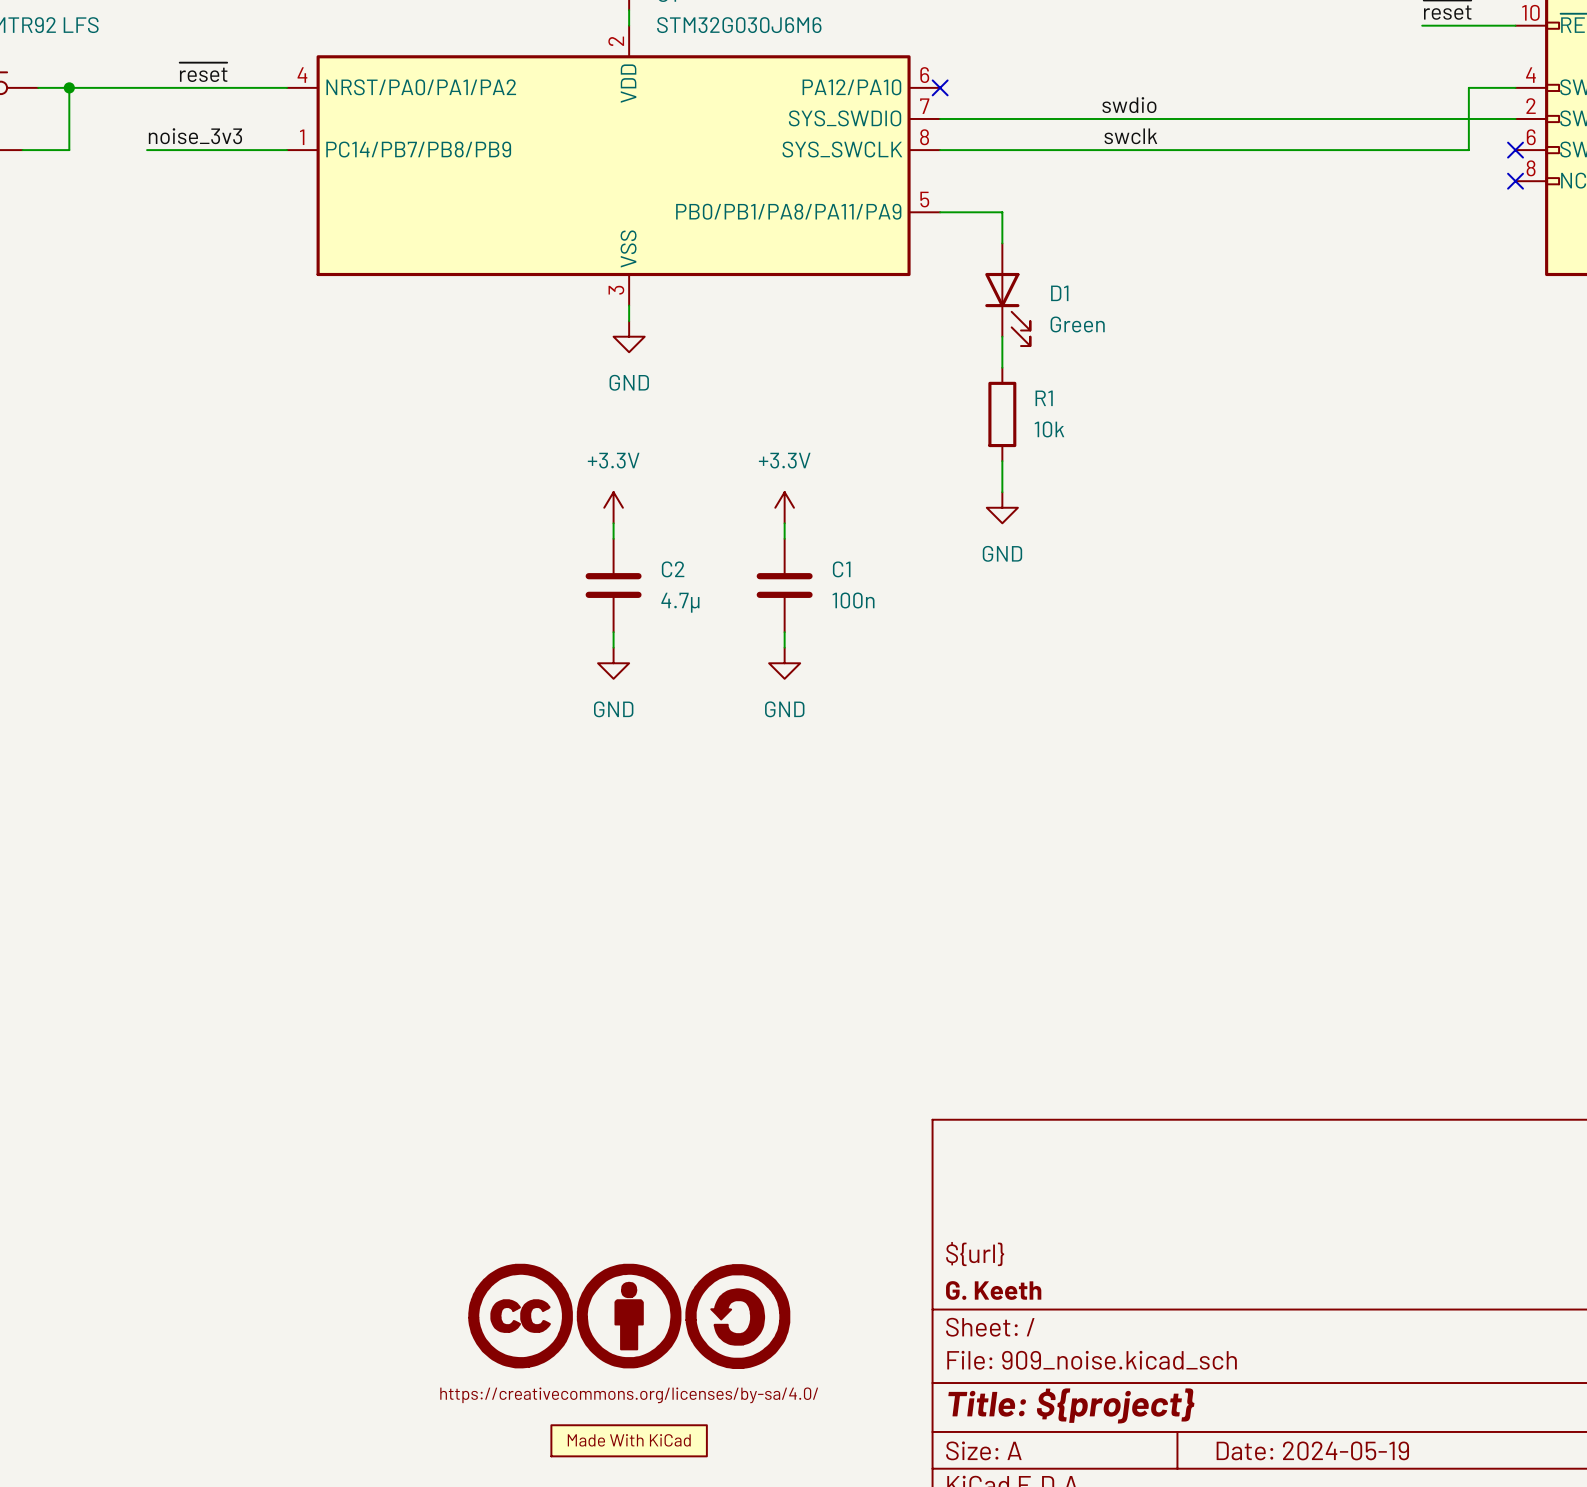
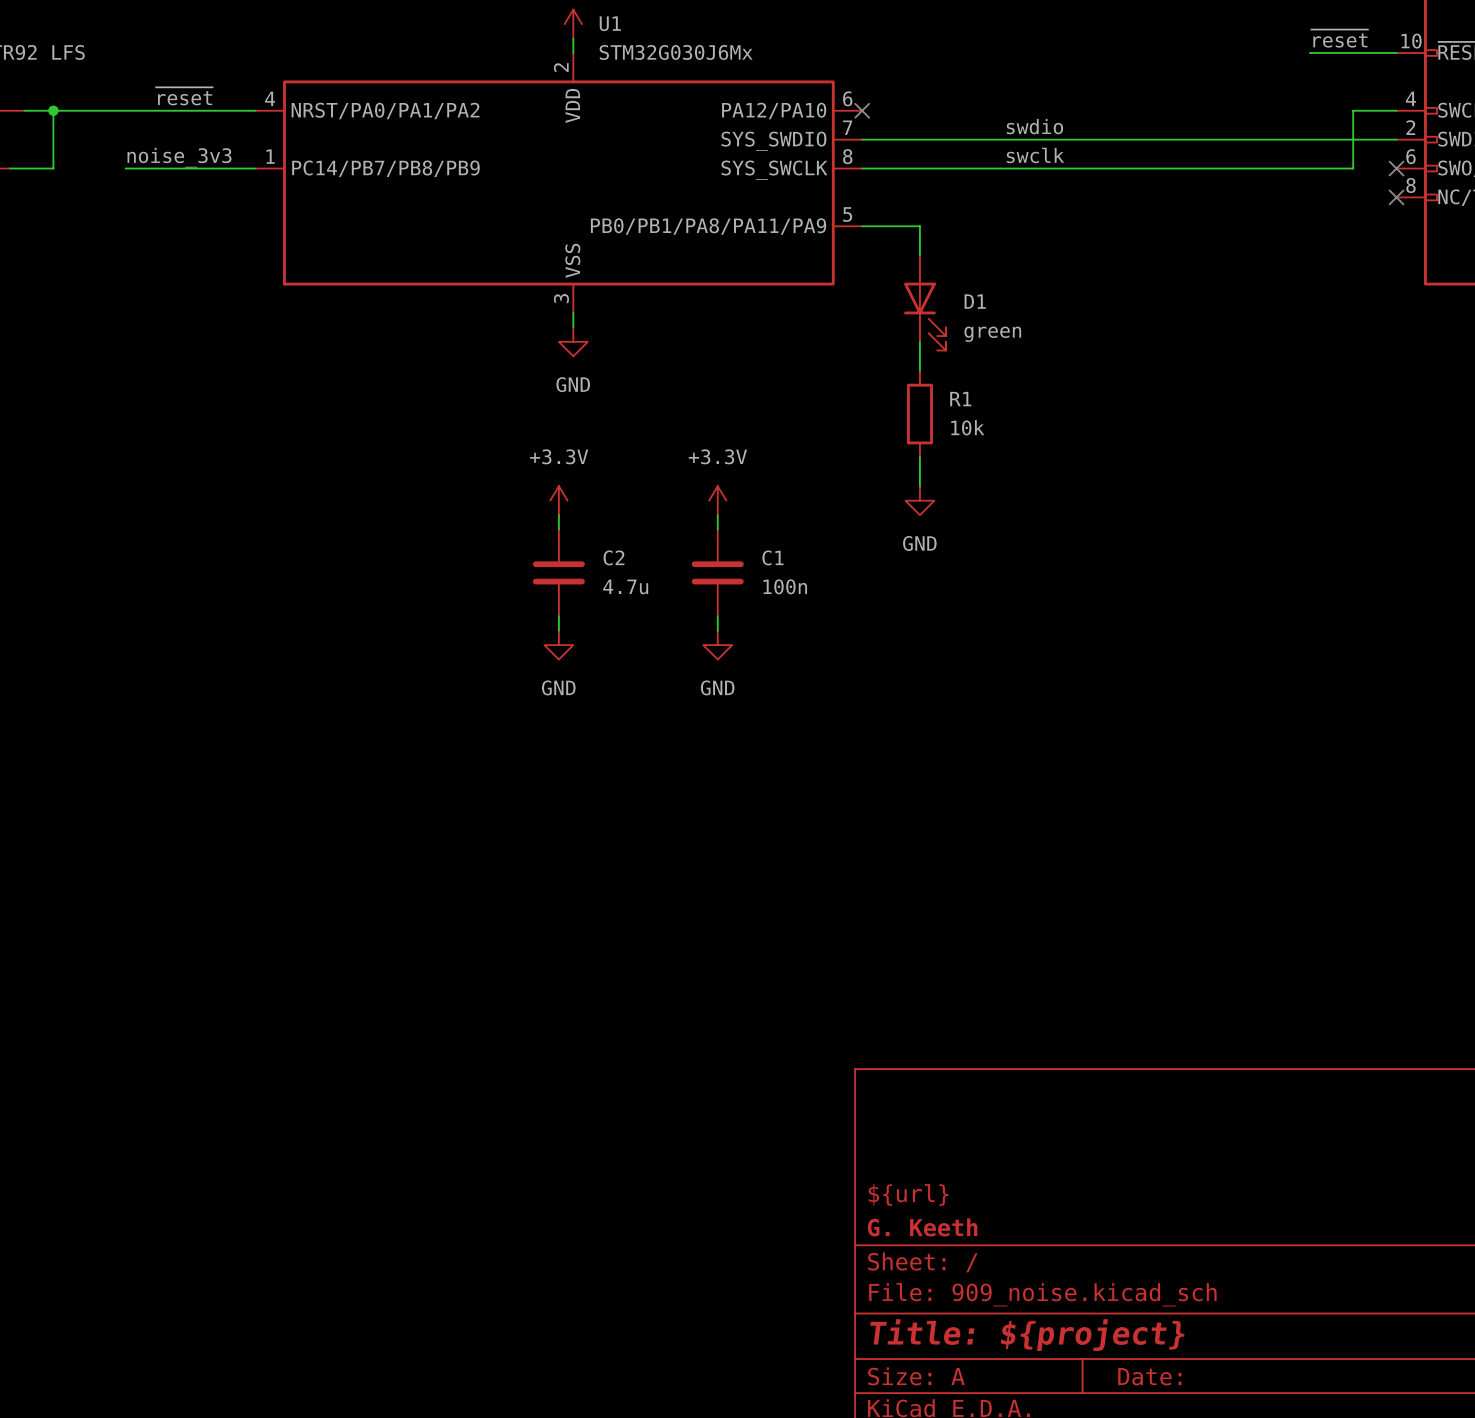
U1 value: STM32G030J6M6 (739, 25) -> STM32G030J6Mx (676, 52)
D1 value: Green (1077, 324) -> green (992, 334)
C2 value: 4.7μ (680, 602) -> 4.7u (625, 586)
part: (629, 1316) -> none
part: (629, 1440) -> none
title block: Date: 2024-05-19 (1312, 1450) -> Date: (1149, 1376)

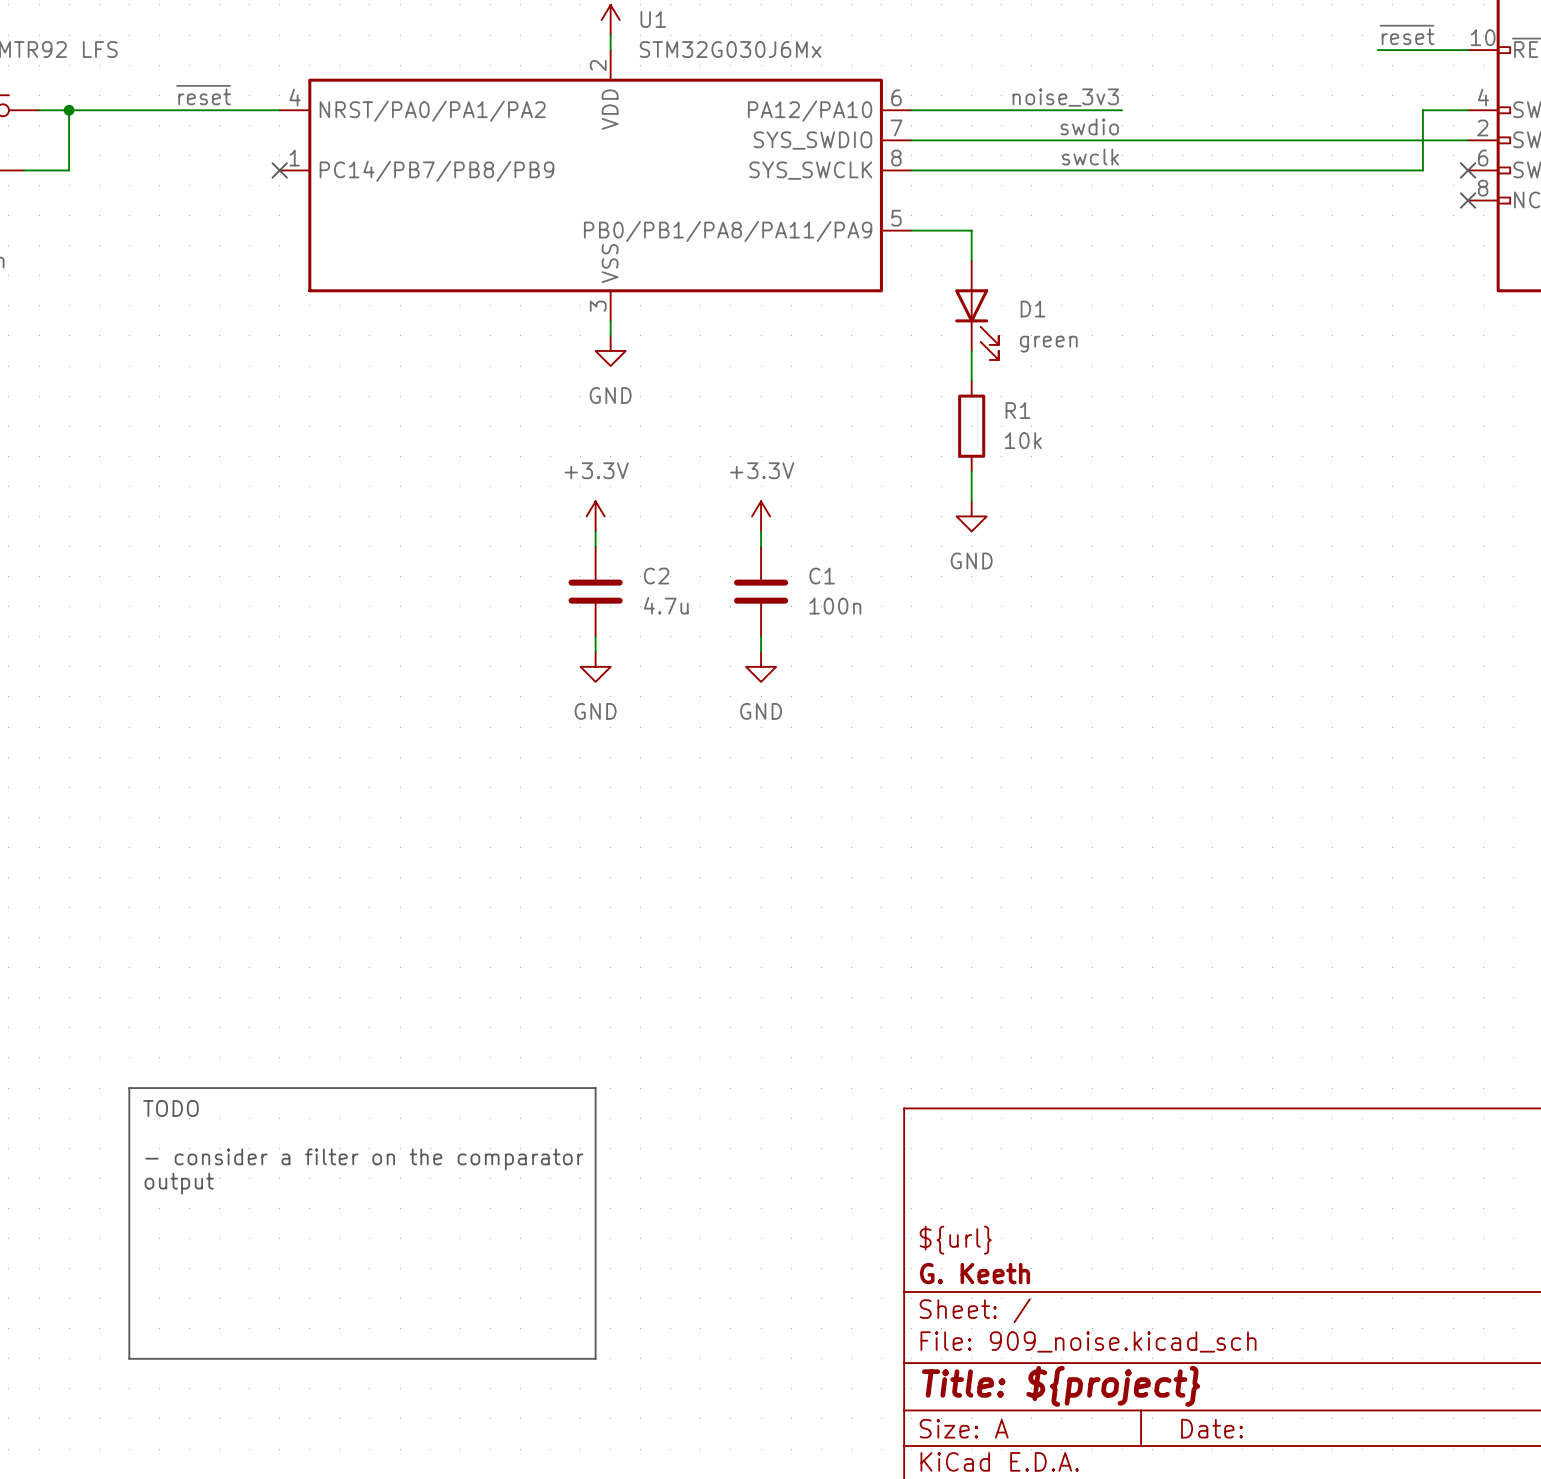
label: none -> noise_3v3 (1065, 97)
wire: none -> (911, 110) (1122, 110)
no-connect mark: (862, 110) -> none
label: noise_3v3 (179, 157) -> none
wire: (125, 168) (255, 168) -> none
no-connect mark: none -> (279, 170)
line: none -> (129, 1088) (595, 1088) (595, 1358) (129, 1358) (129, 1088)
text: none -> TODO (170, 1108)
text: none -> - consider a filter on the comparator (364, 1159)
text: none -> output (179, 1183)

